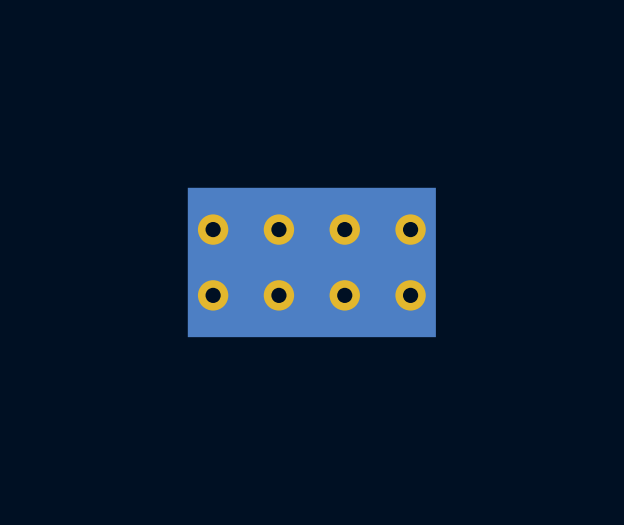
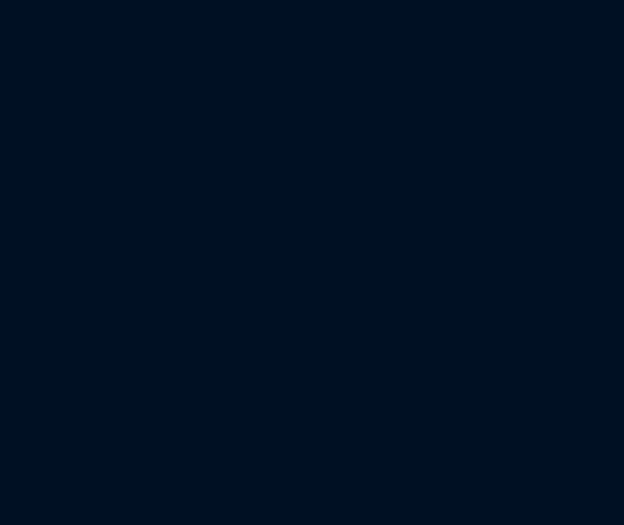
part: (311, 262) -> none

